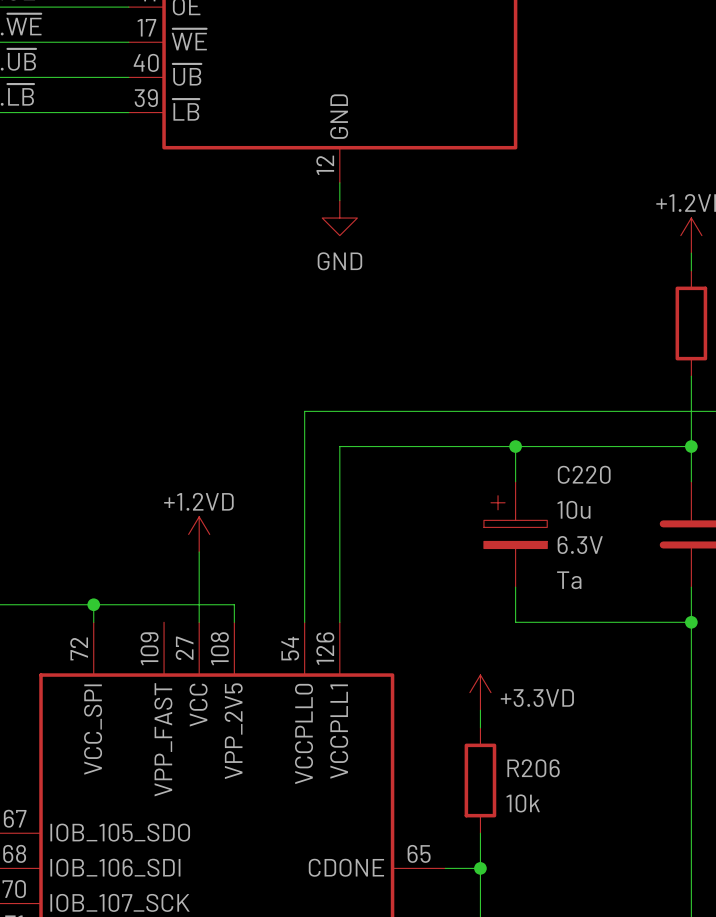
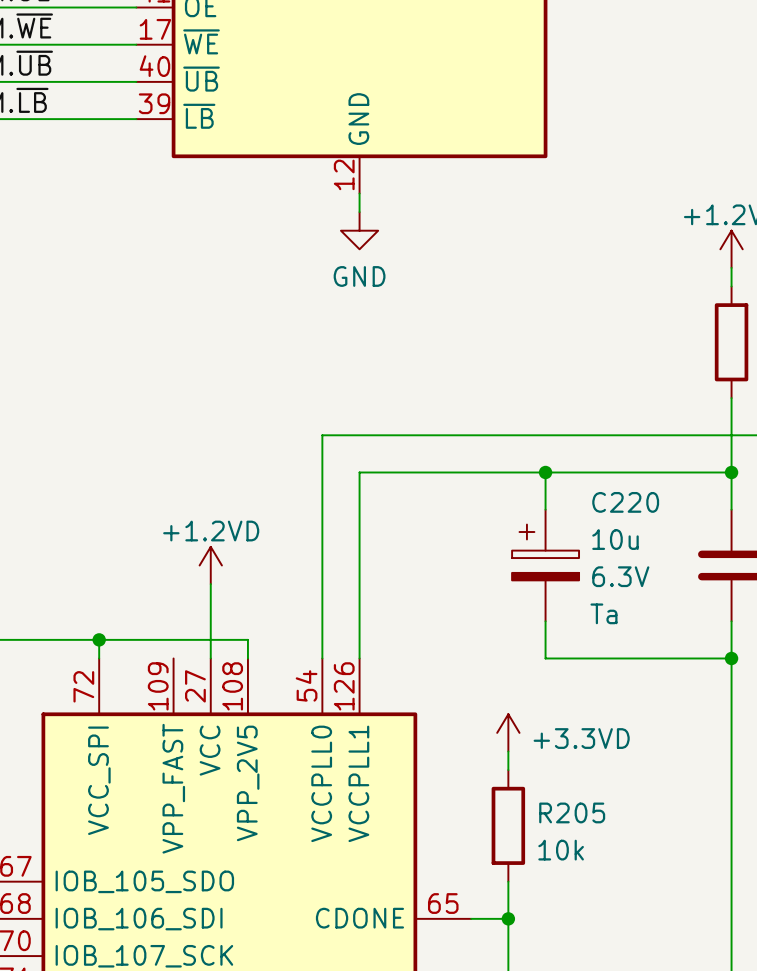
R206 name: R206 (533, 768) -> R205 (572, 812)

